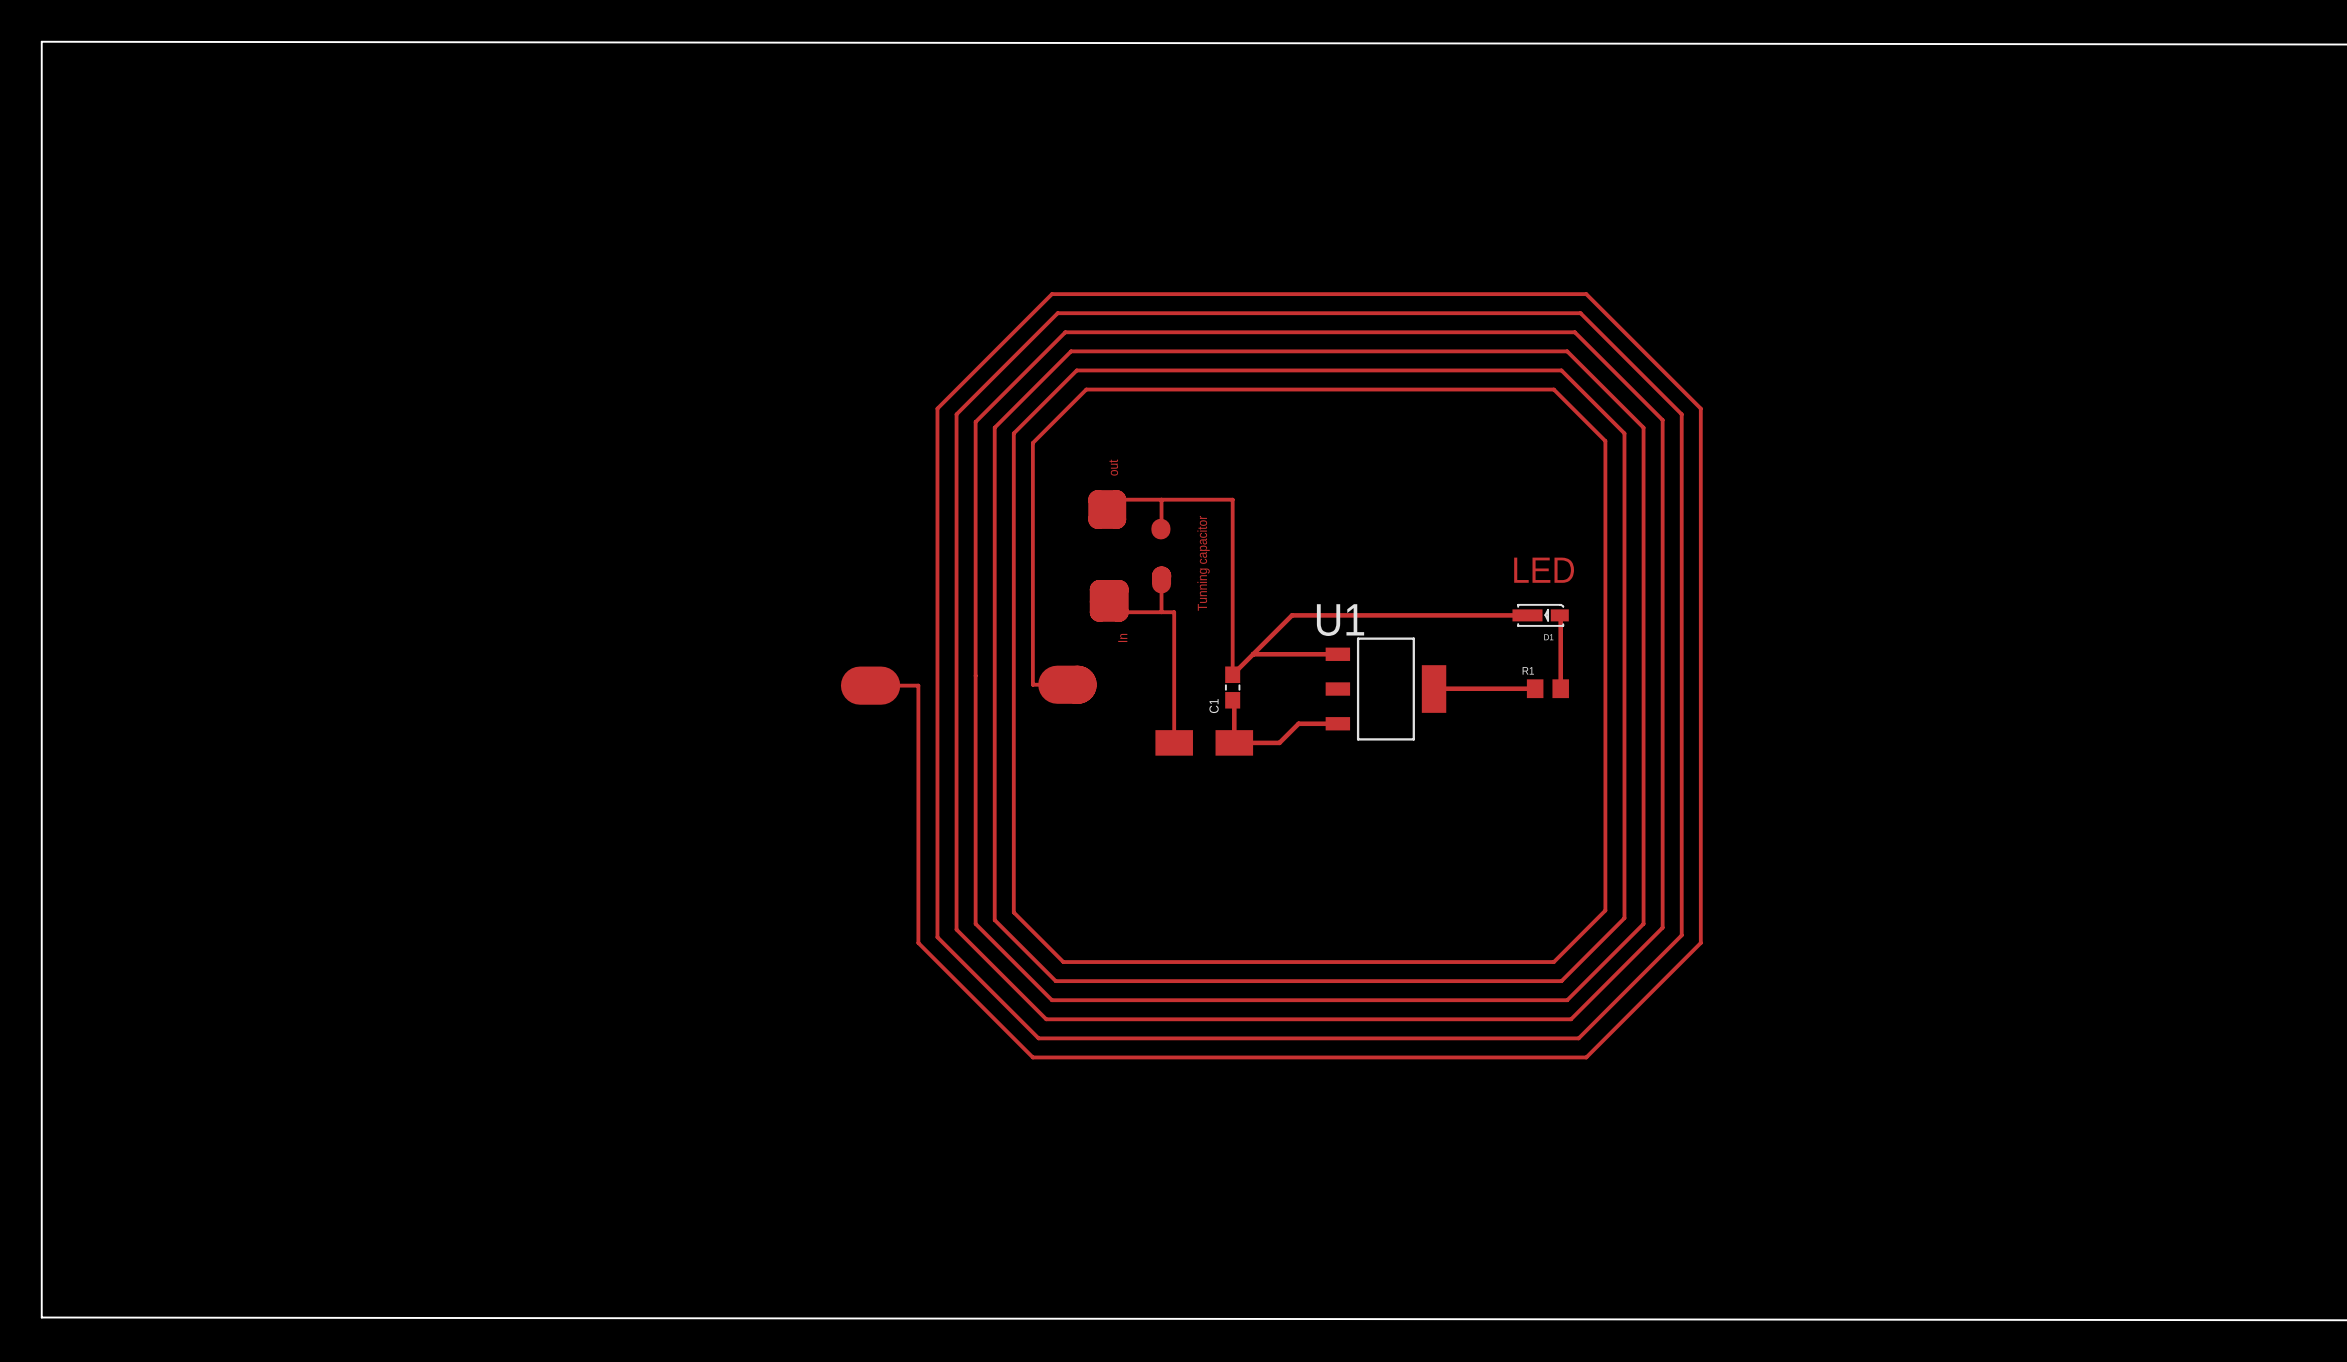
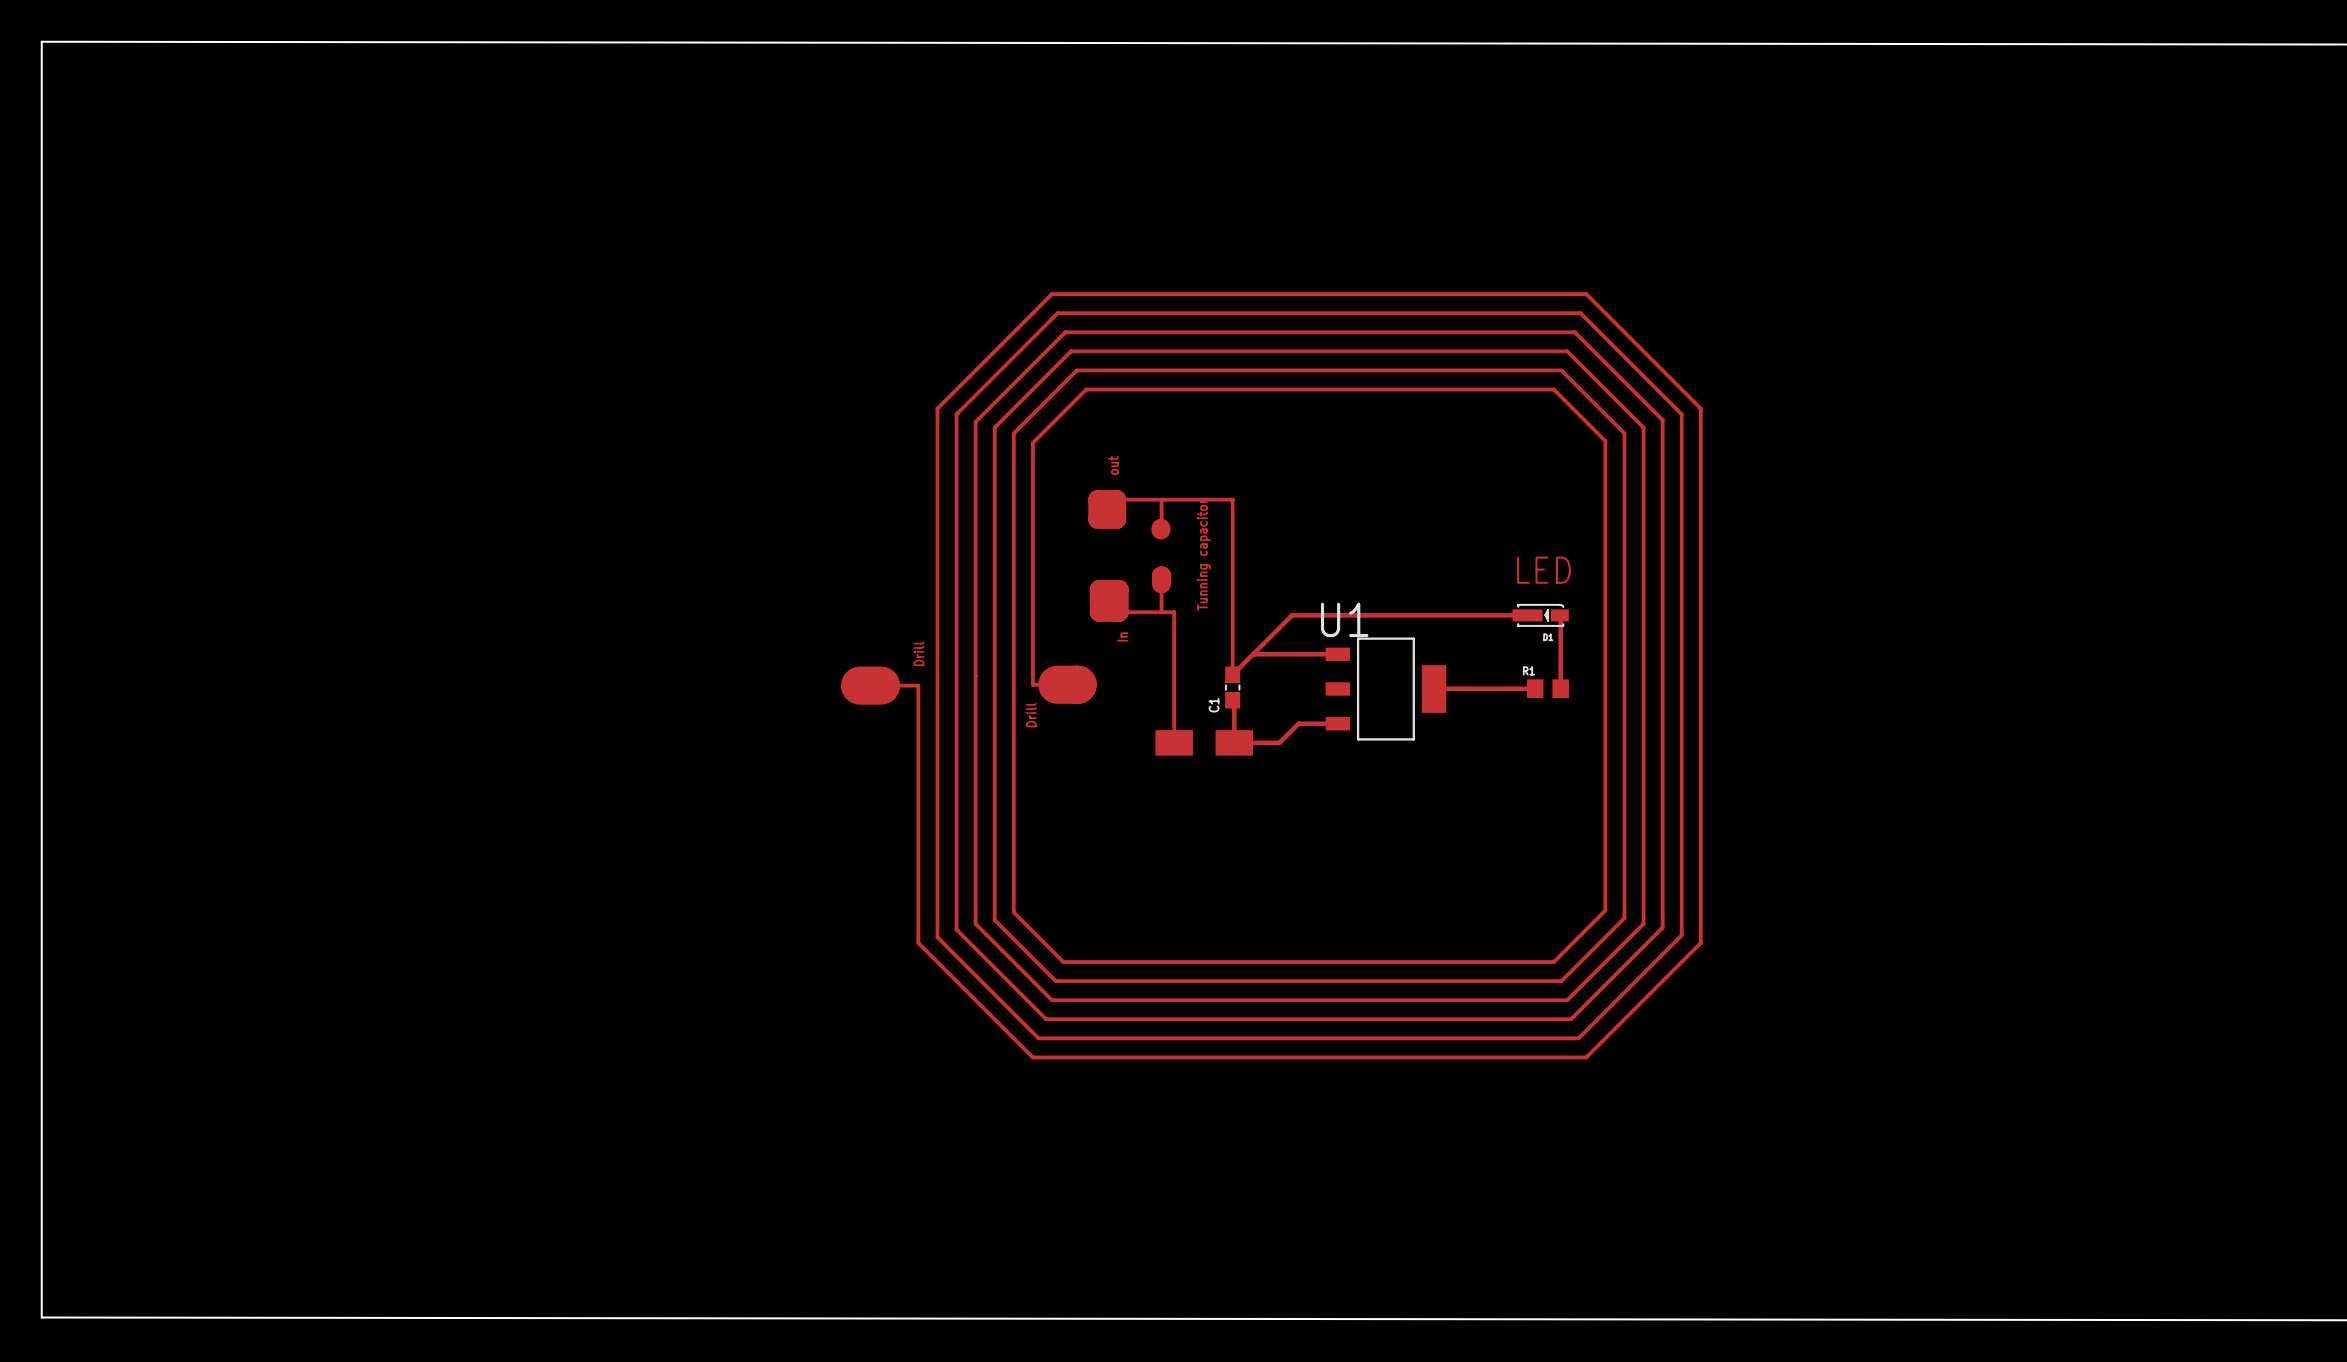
text: none -> Drill (919, 653)
text: none -> Drill (1031, 715)

